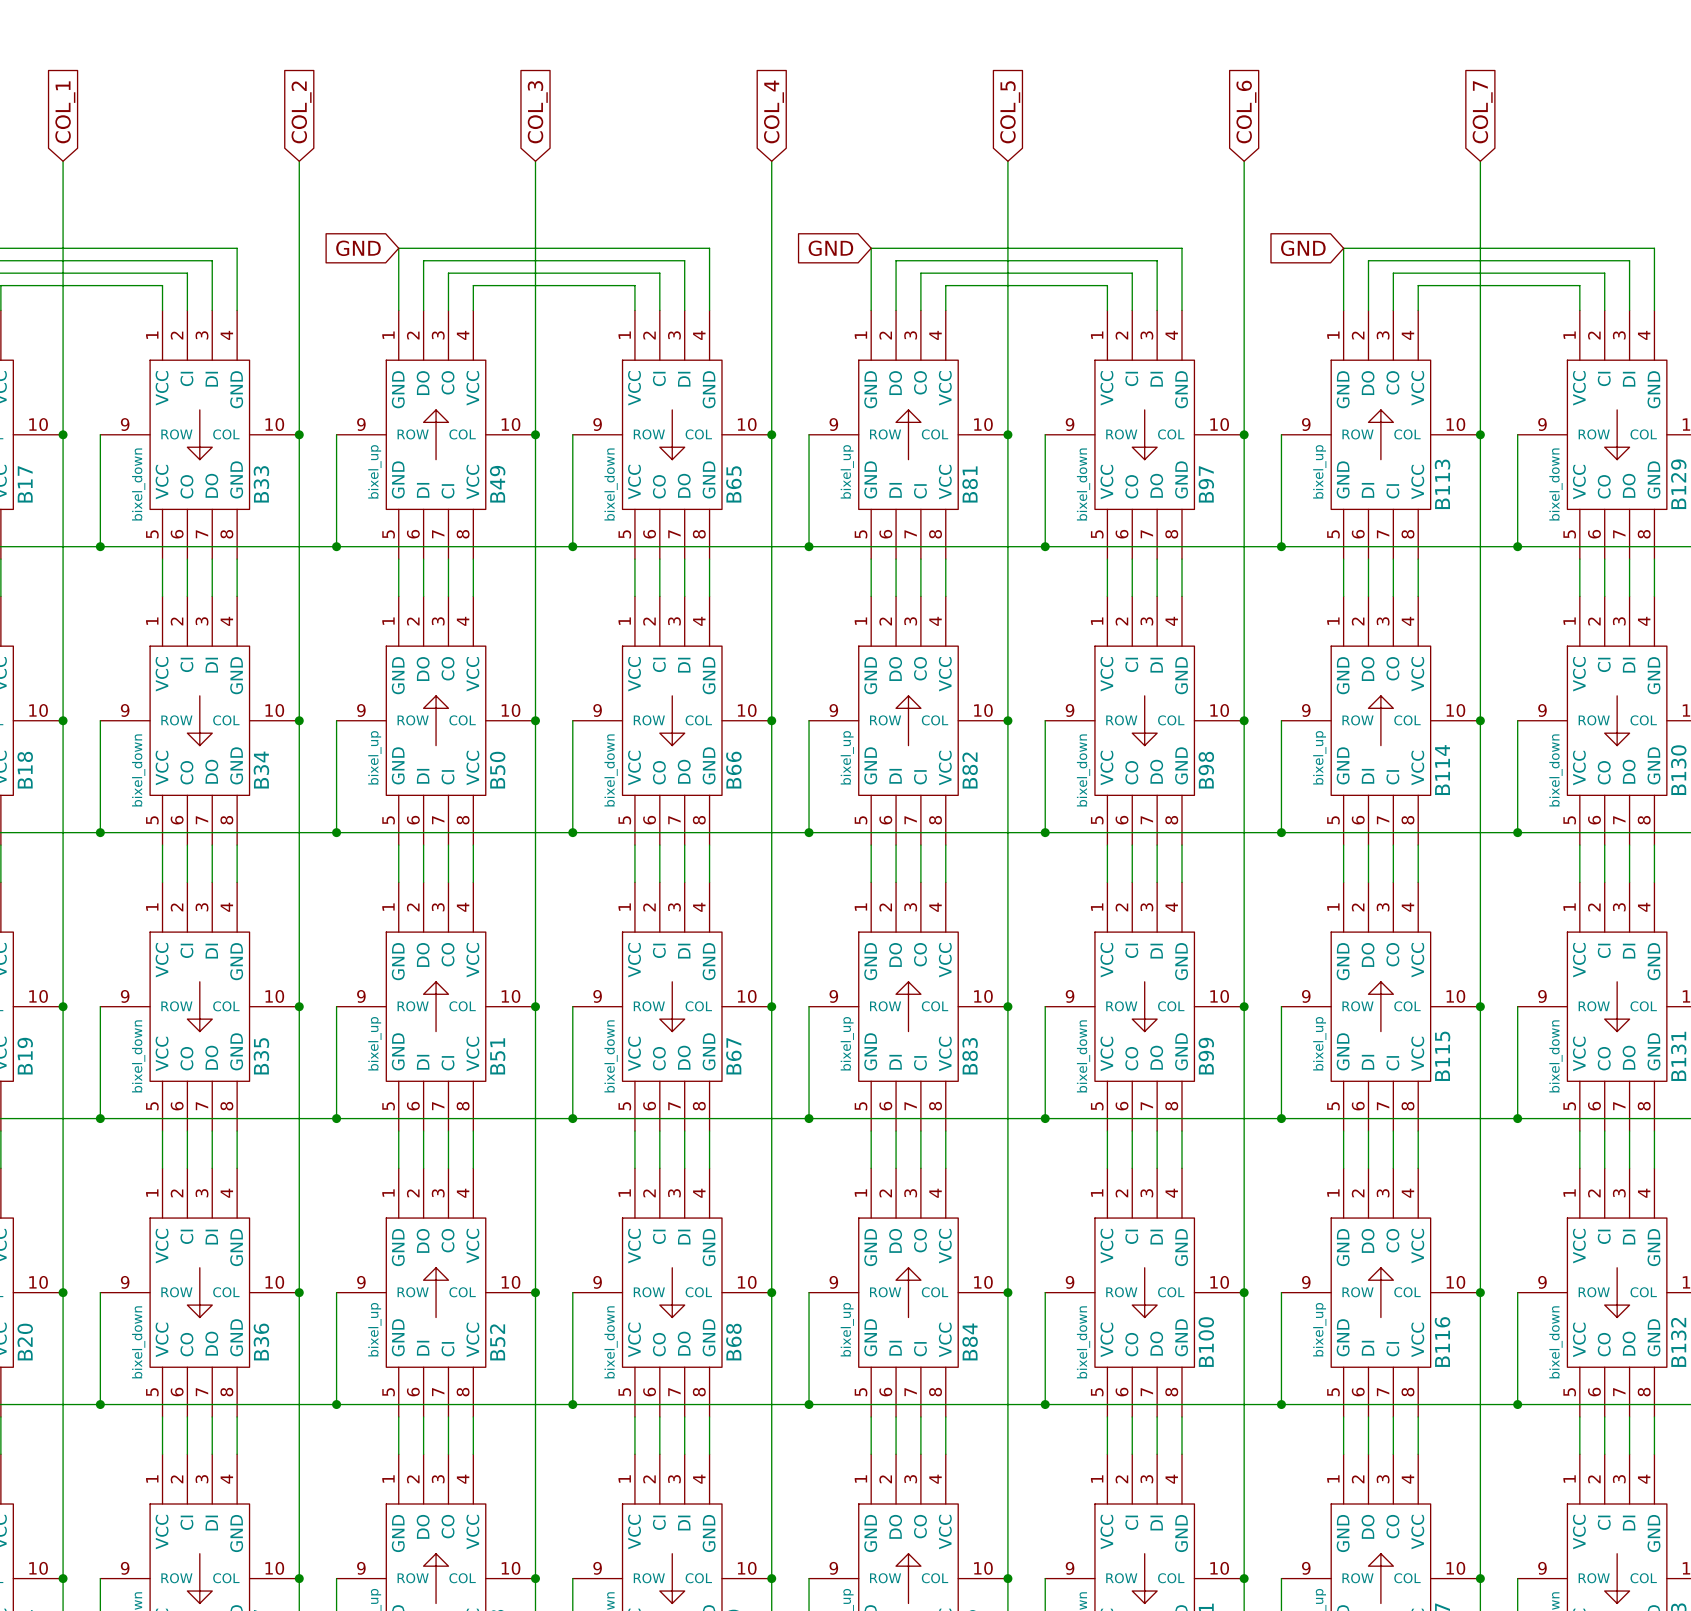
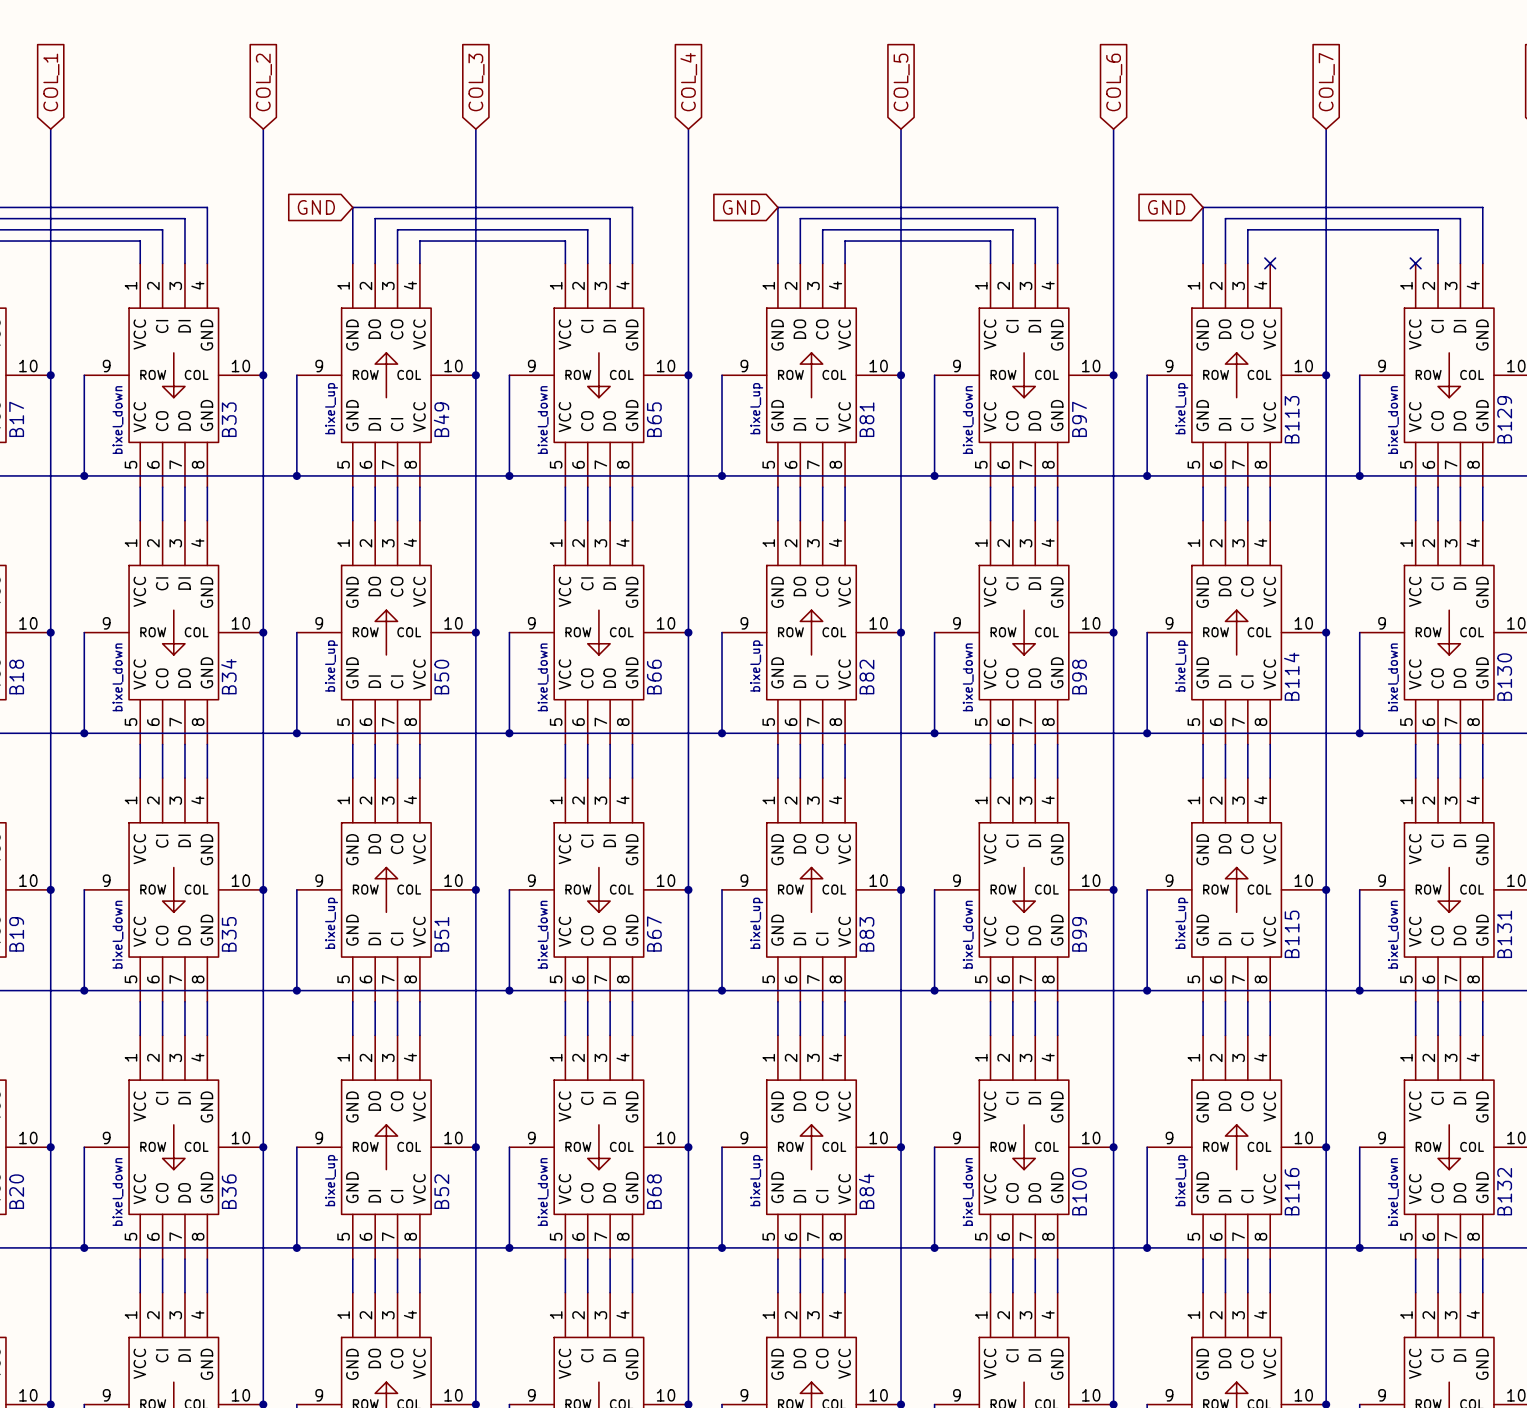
wire: (1418, 310) (1418, 285) (1579, 285) (1579, 310) -> none
no-connect mark: none -> (1270, 263)
no-connect mark: none -> (1415, 263)

